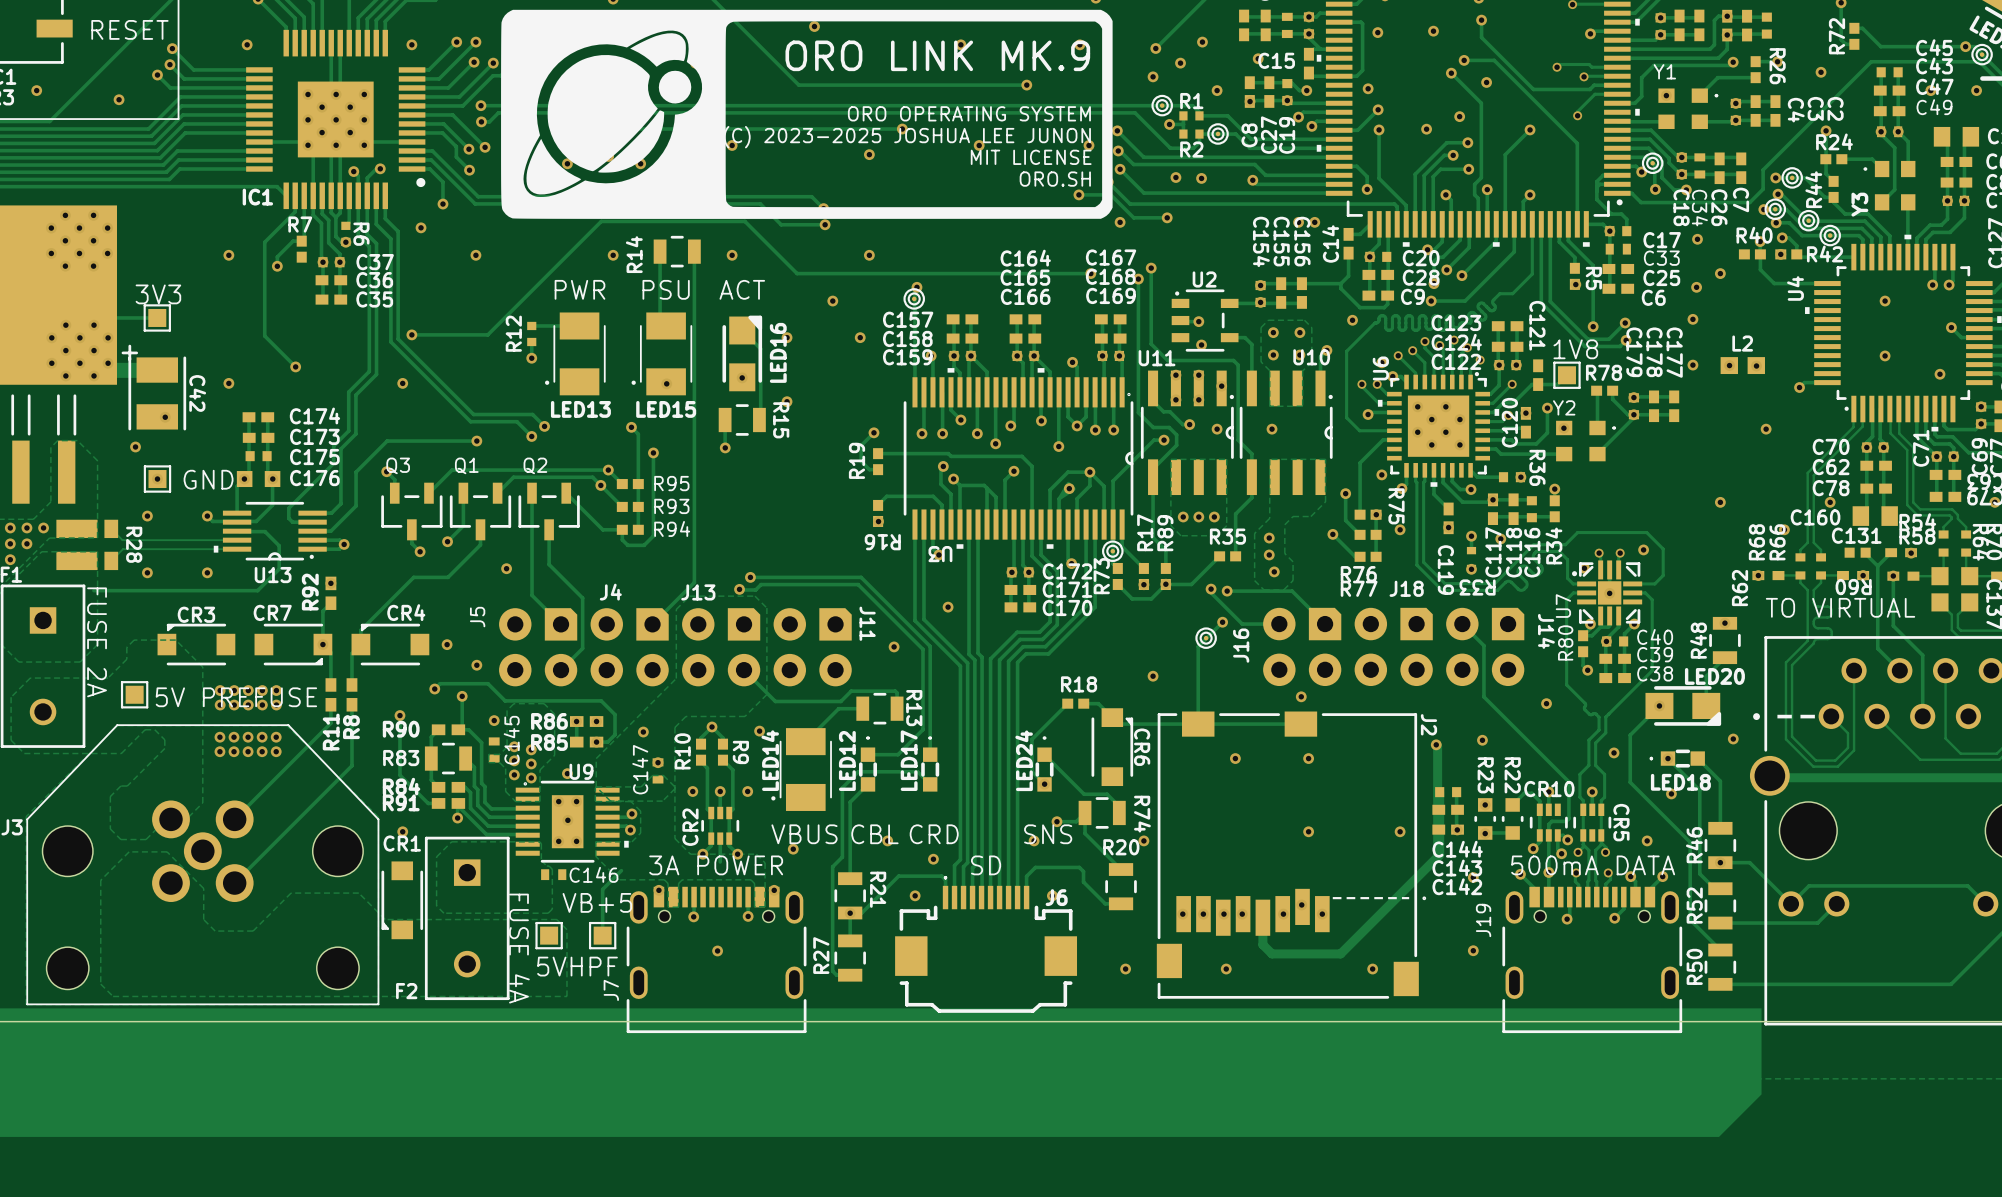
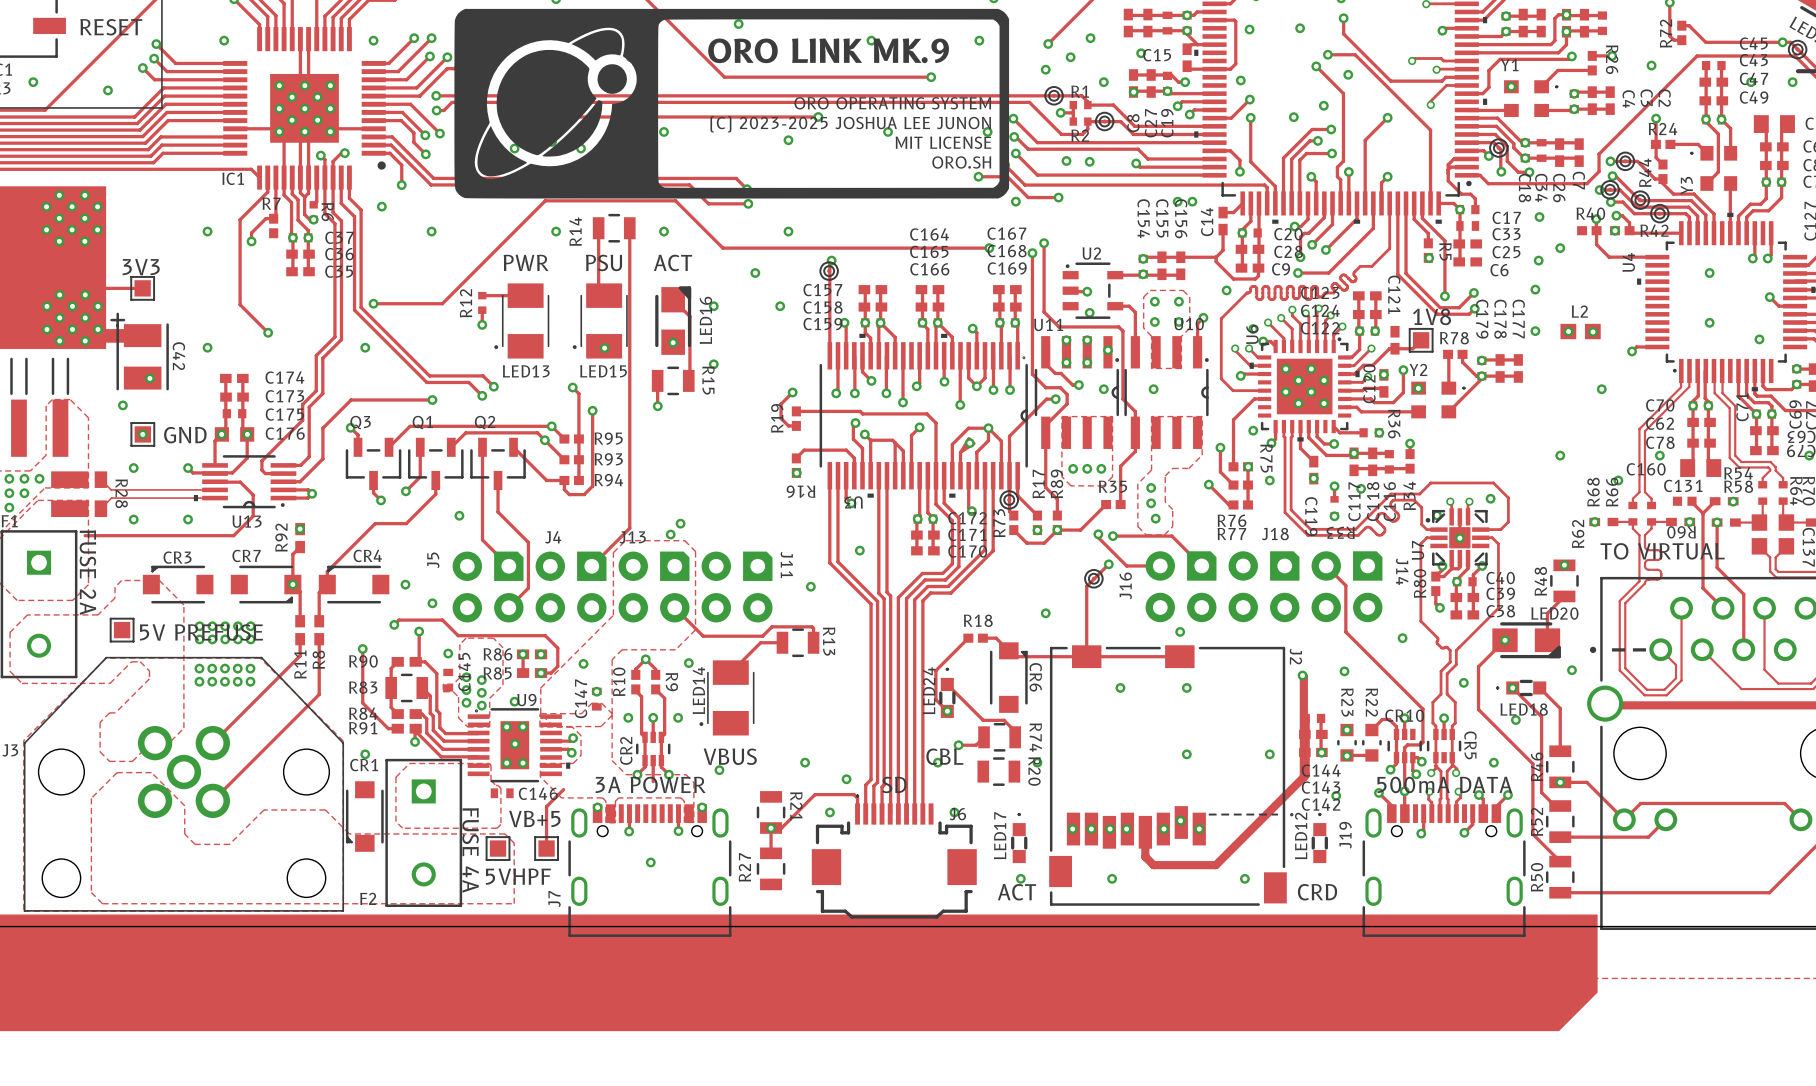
track: (750, 577) (861, 577) (930, 646) (930, 754) -> none
track: (739, 589) (755, 589) (761, 584) (858, 584) (922, 649) (922, 729) (897, 754) (868, 754) -> none
LED12 position: (868, 763) -> (1319, 837)
LED17 position: (930, 763) -> (1019, 837)
track: (868, 784) (850, 802) (850, 878) -> none
track: (930, 784) (917, 771) (858, 771) (842, 787) (842, 857) (832, 866) (832, 971) (836, 975) (850, 975) -> none
track: (1085, 812) (1085, 833) (1121, 869) -> none
text: CBL (874, 834) -> none
text: CRD (934, 834) -> none
text: SNS (1048, 834) -> CBL (944, 756)
R20 rotation: 0° (1121, 886) -> 90° clockwise (998, 771)
R20 position: (1121, 886) -> (998, 771)
track: (1026, 897) (1026, 876) (1035, 867) (1079, 867) (1083, 871) (1083, 882) (1105, 903) (1121, 903) -> none
via: (1473, 950) -> none
text: none -> ACT (1017, 892)
text: none -> CRD (1317, 892)

